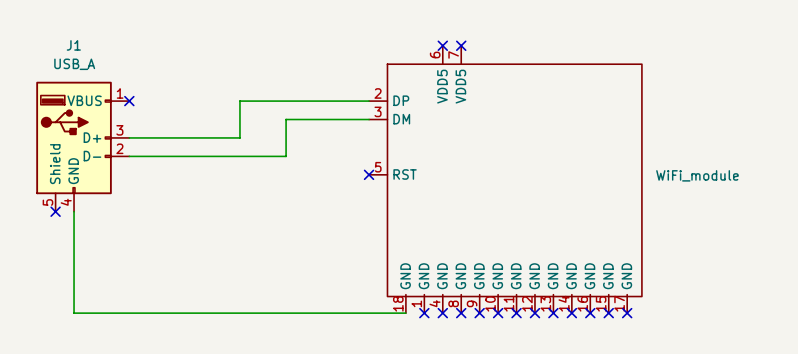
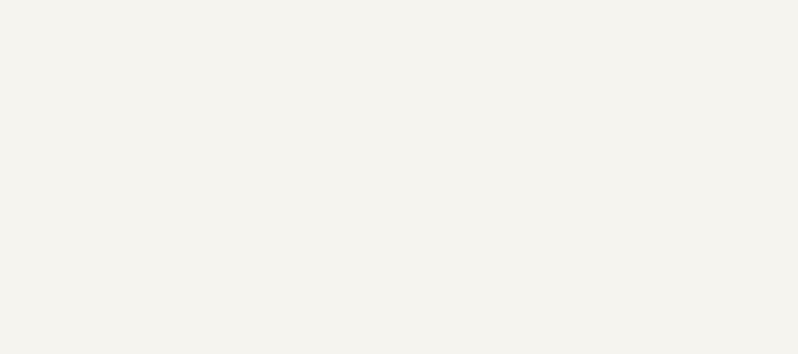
no-connect mark: (442, 45) -> none
no-connect mark: (461, 45) -> none
no-connect mark: (129, 101) -> none
wire: (369, 101) (239, 101) (239, 137) (129, 137) -> none
wire: (369, 119) (286, 119) (286, 156) (129, 156) -> none
J1: USB_A (82, 146) -> none
no-connect mark: (369, 174) -> none
WiFi_module: (505, 179) -> none
no-connect mark: (55, 211) -> none
wire: (74, 211) (74, 313) (405, 313) -> none
no-connect mark: (424, 313) -> none
no-connect mark: (442, 313) -> none
no-connect mark: (461, 313) -> none
no-connect mark: (479, 313) -> none
no-connect mark: (498, 313) -> none
no-connect mark: (516, 313) -> none
no-connect mark: (534, 313) -> none
no-connect mark: (553, 313) -> none
no-connect mark: (571, 313) -> none
no-connect mark: (590, 313) -> none
no-connect mark: (608, 313) -> none
no-connect mark: (627, 313) -> none

